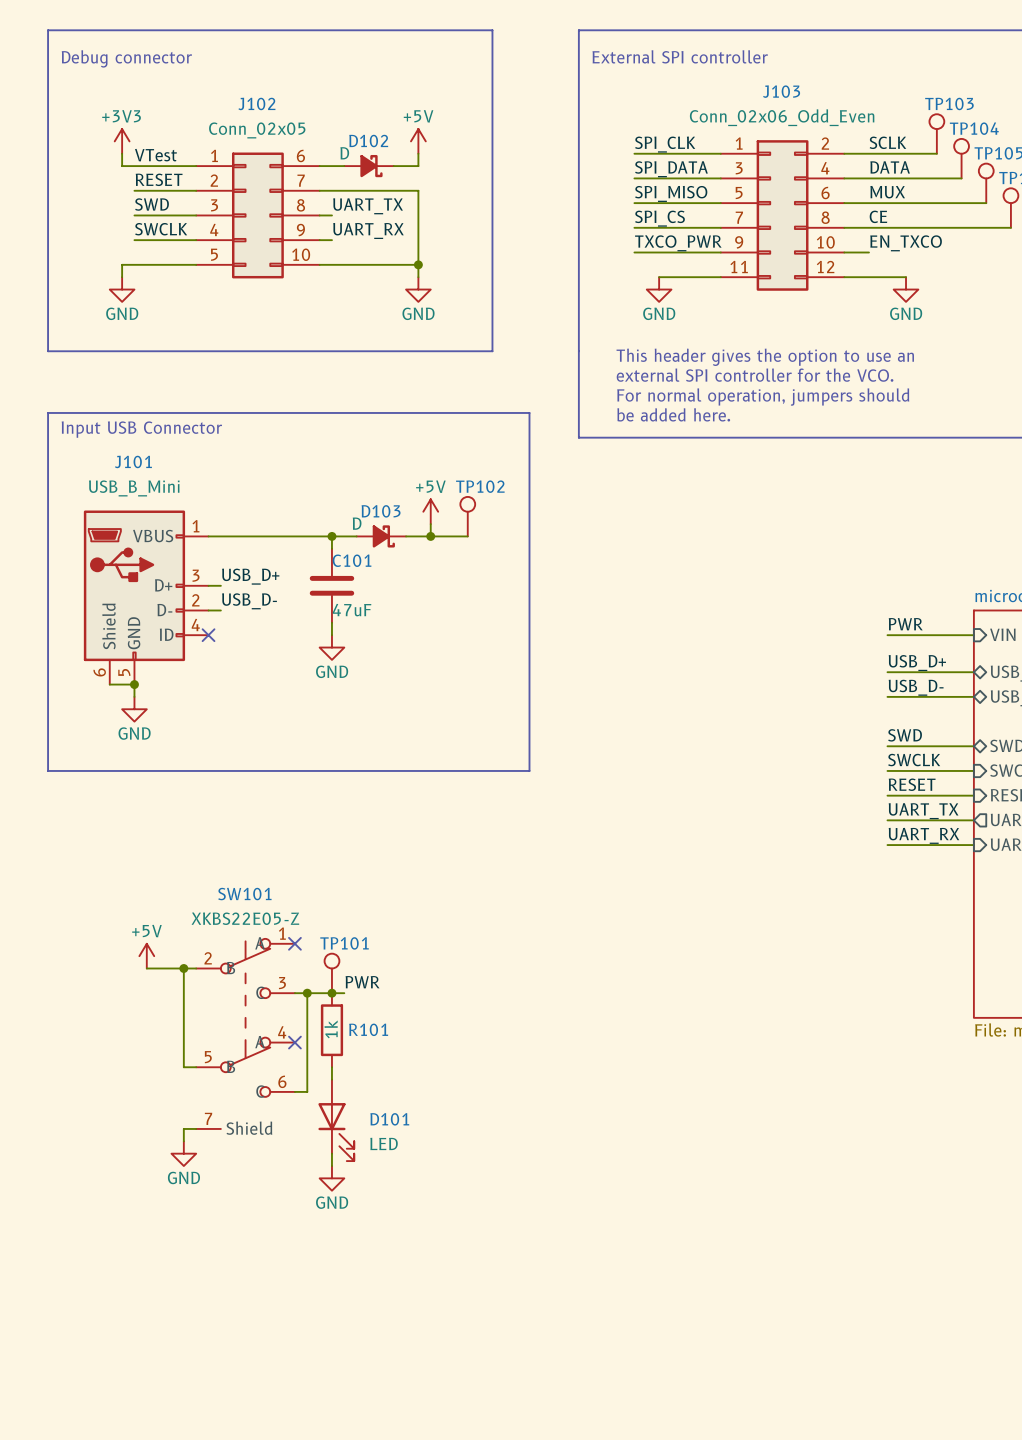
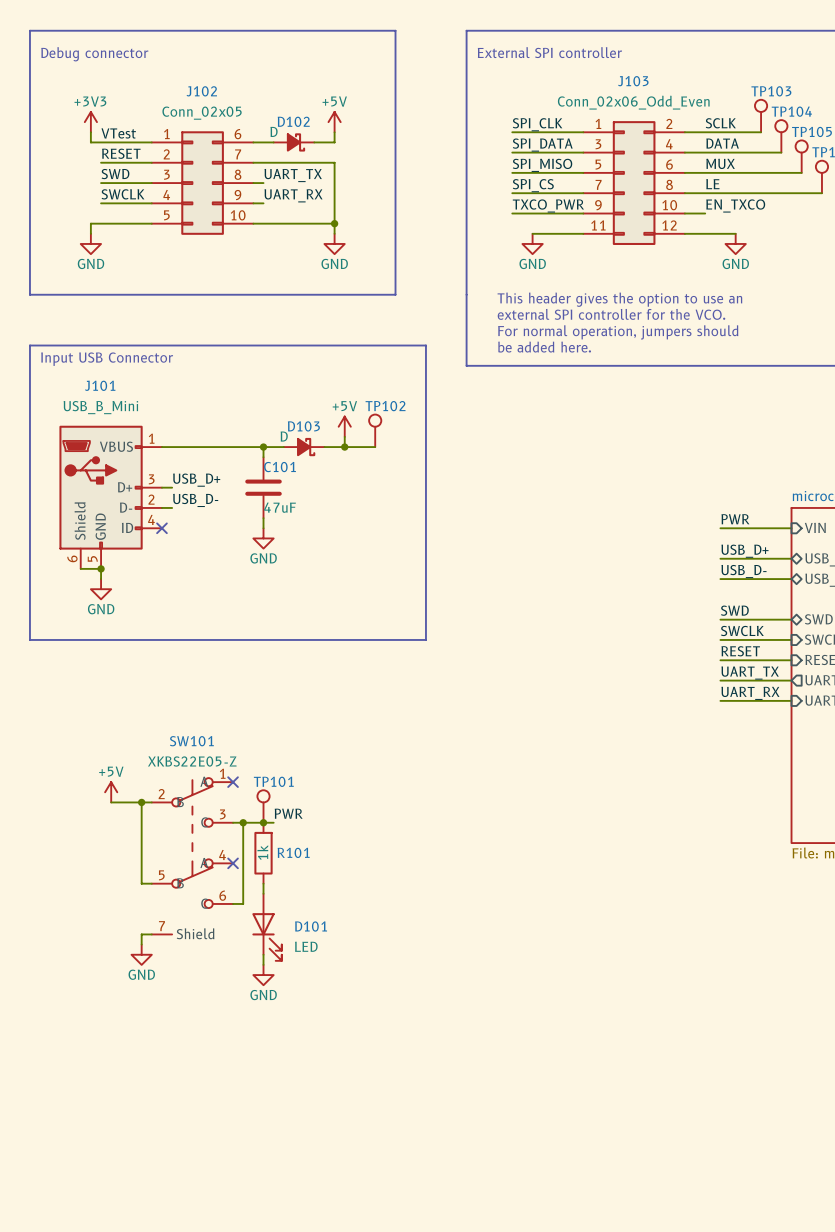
label: CE (878, 216) -> LE (712, 184)

